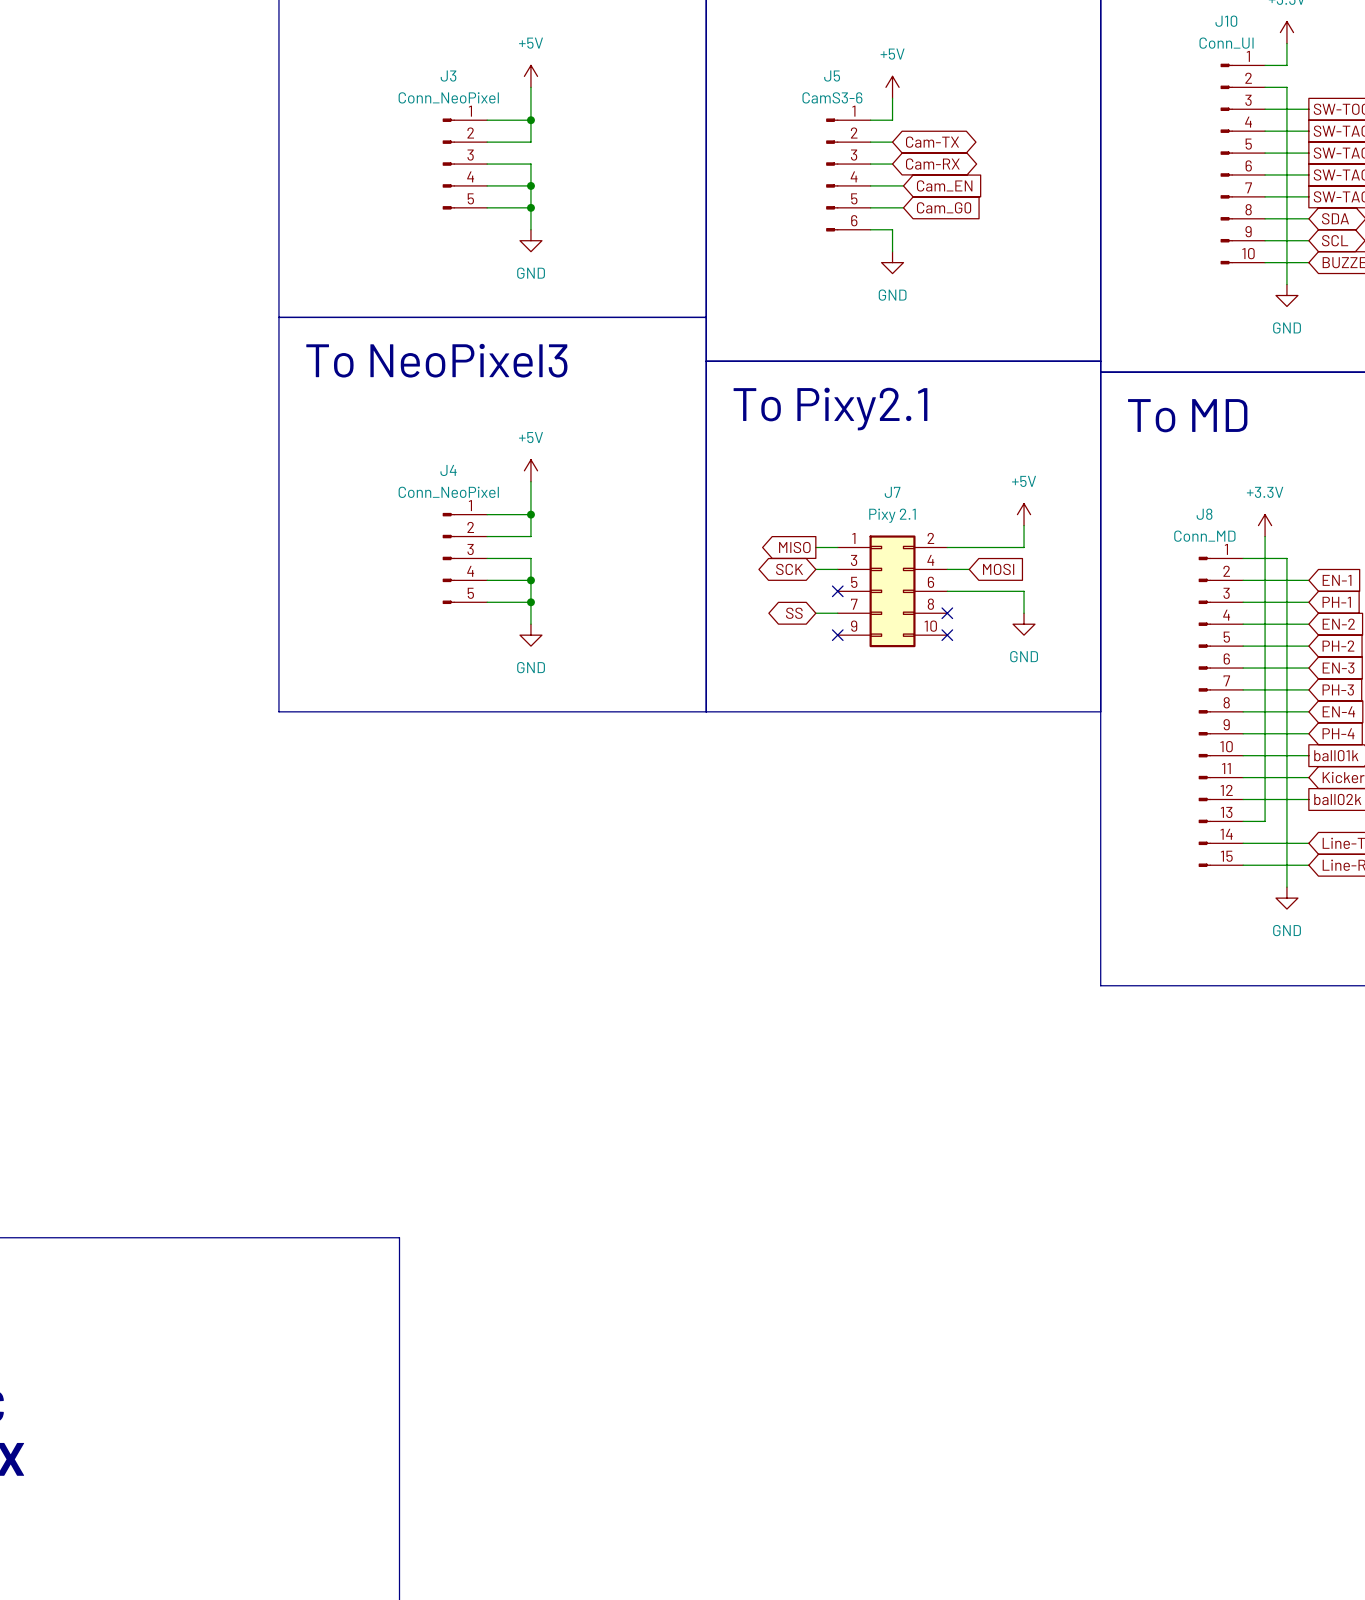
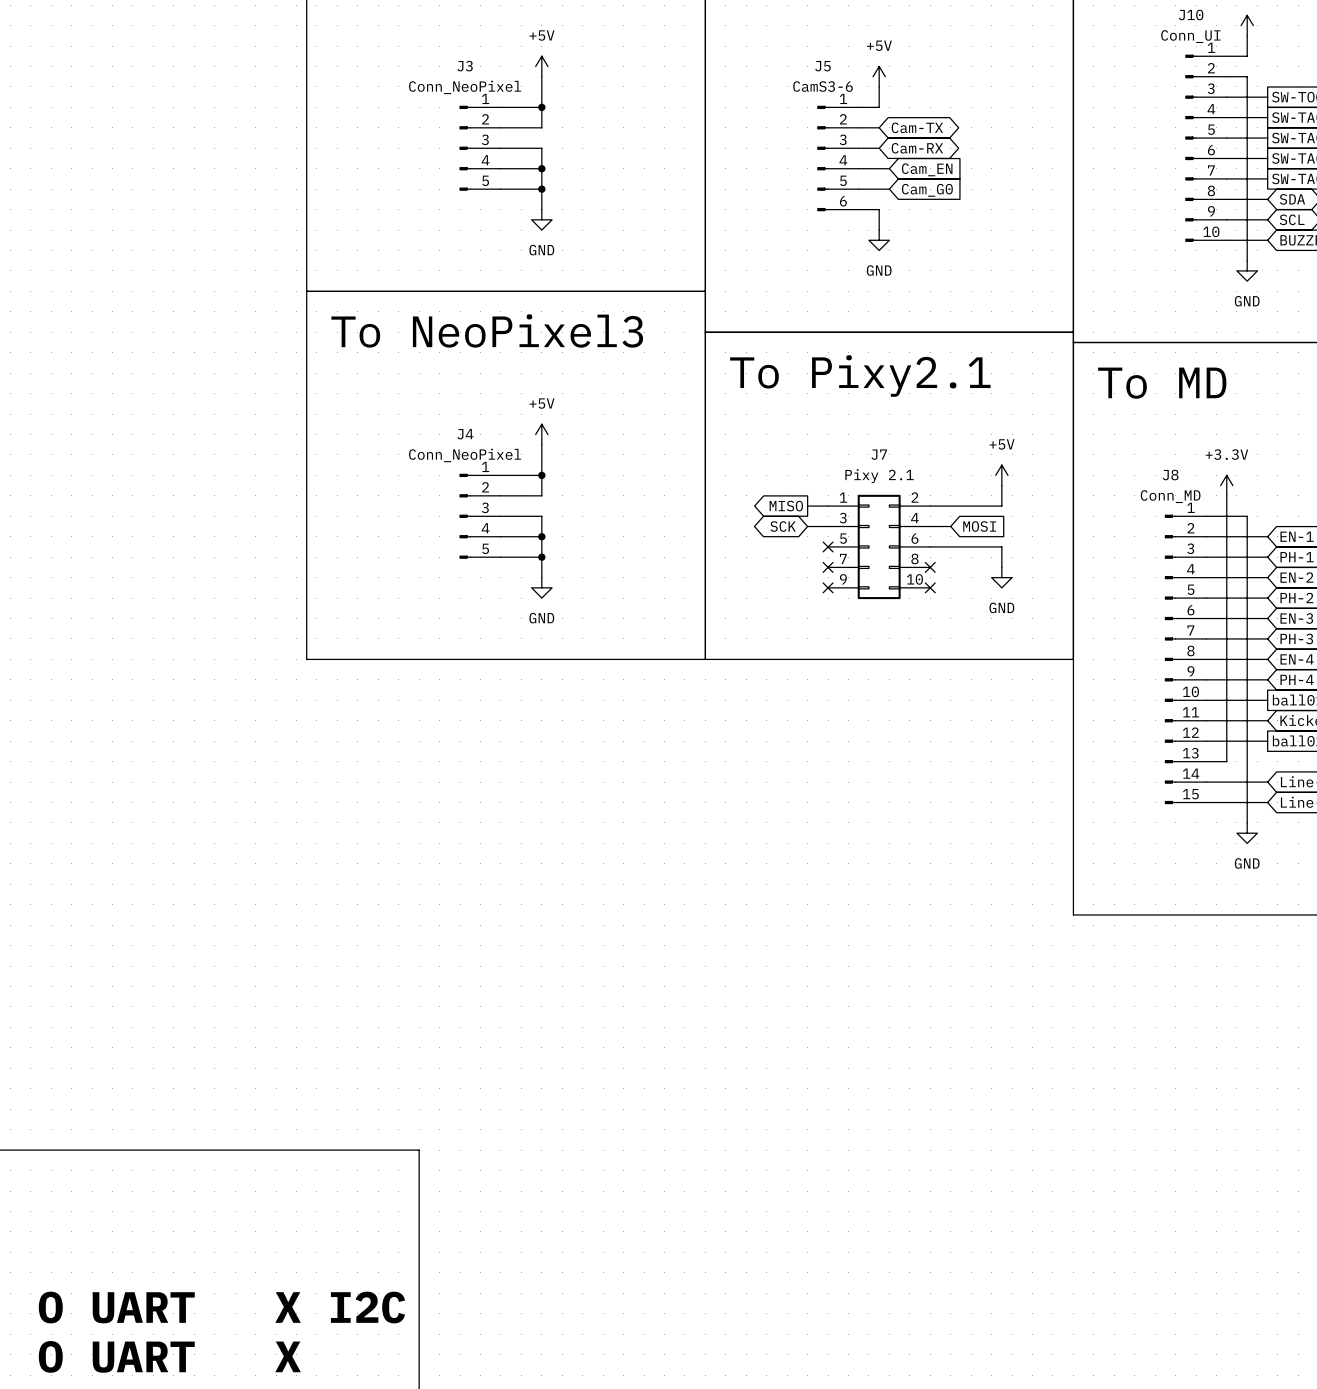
global label: SS (794, 613) -> none
wire: (815, 613) (837, 613) -> none
no-connect mark: none -> (828, 567)

